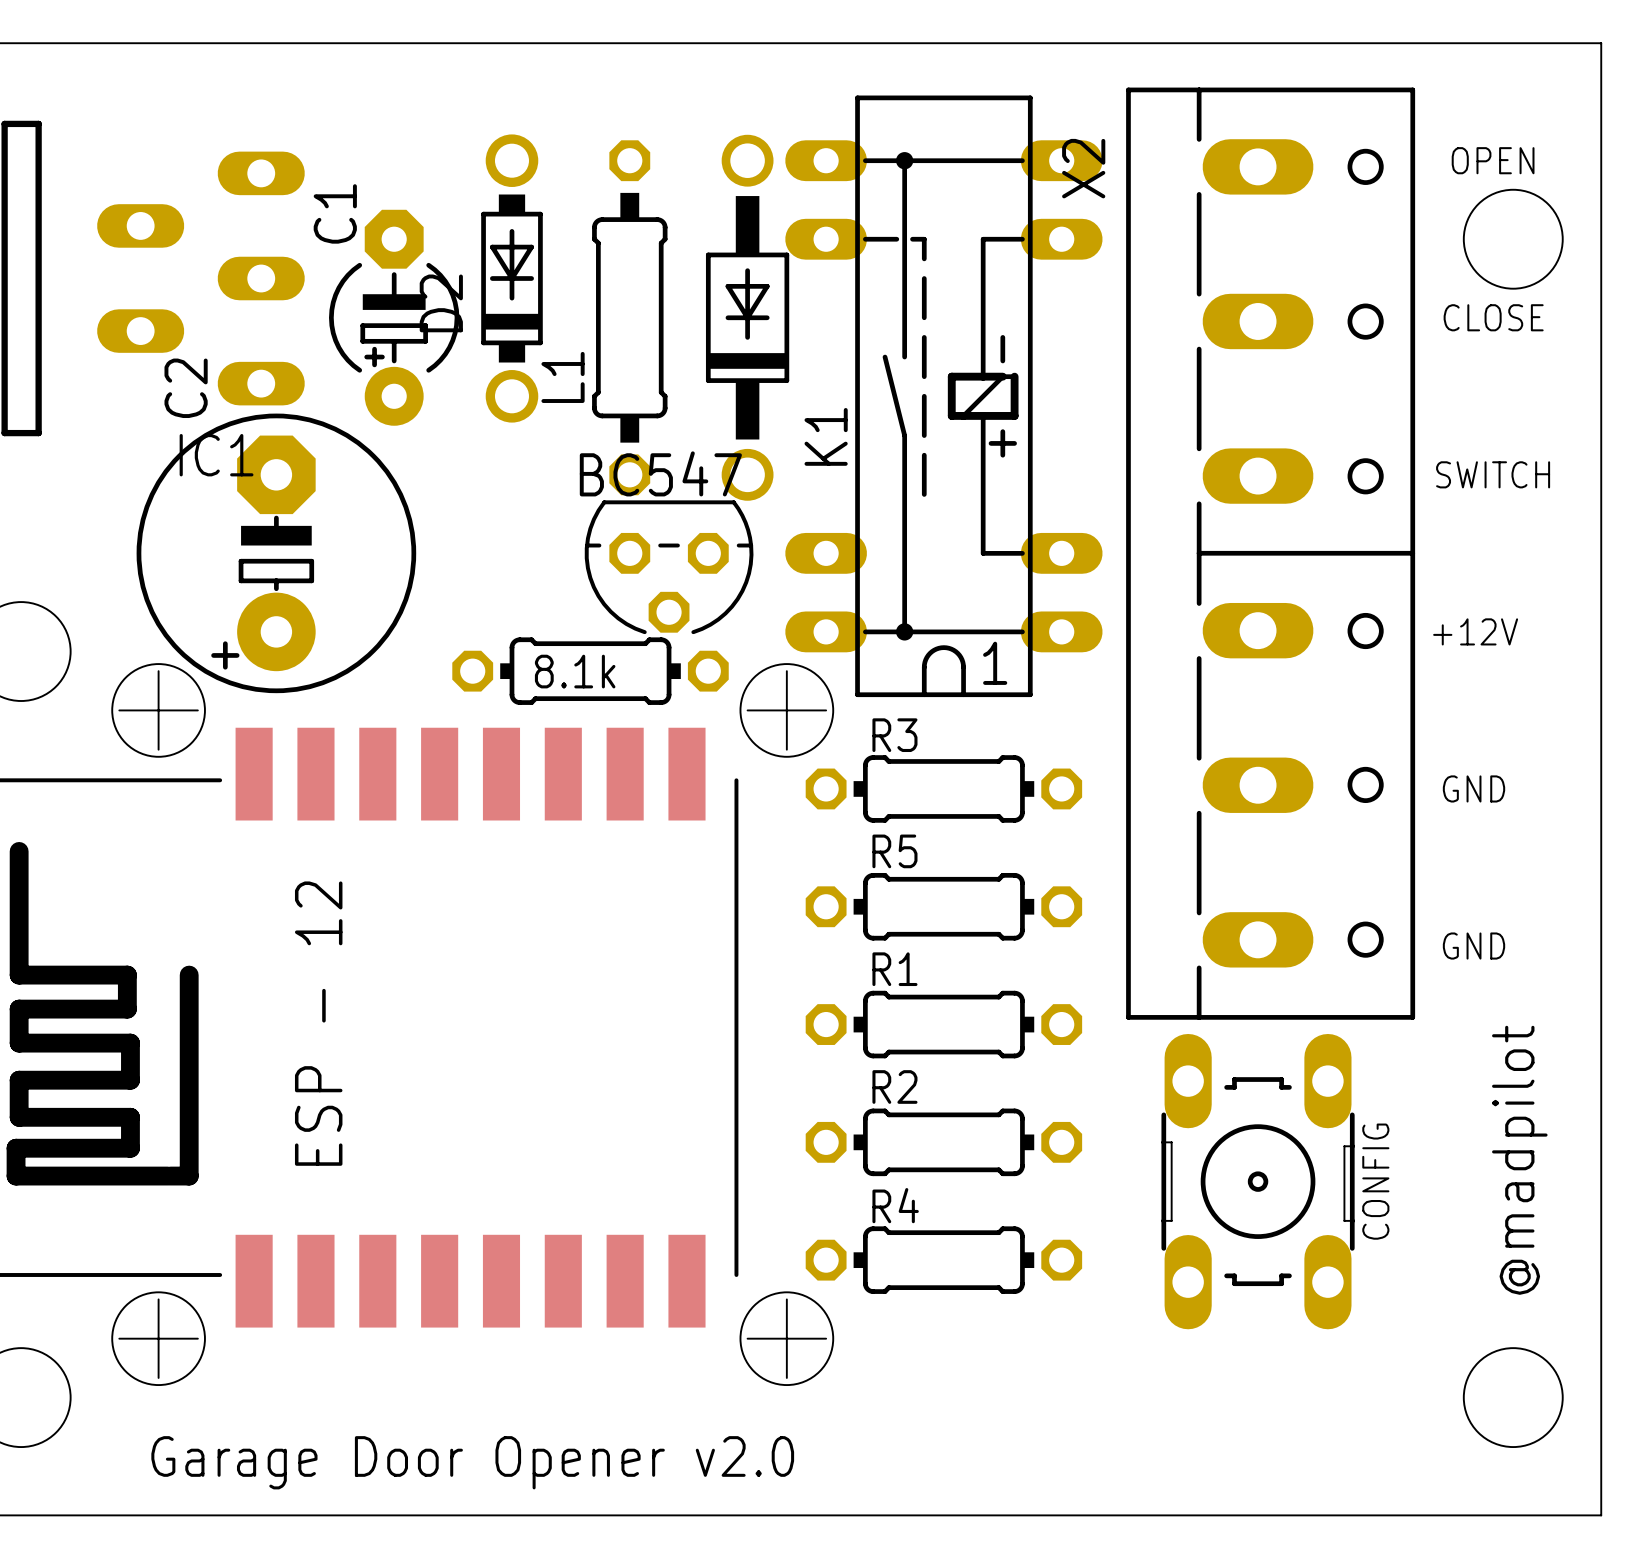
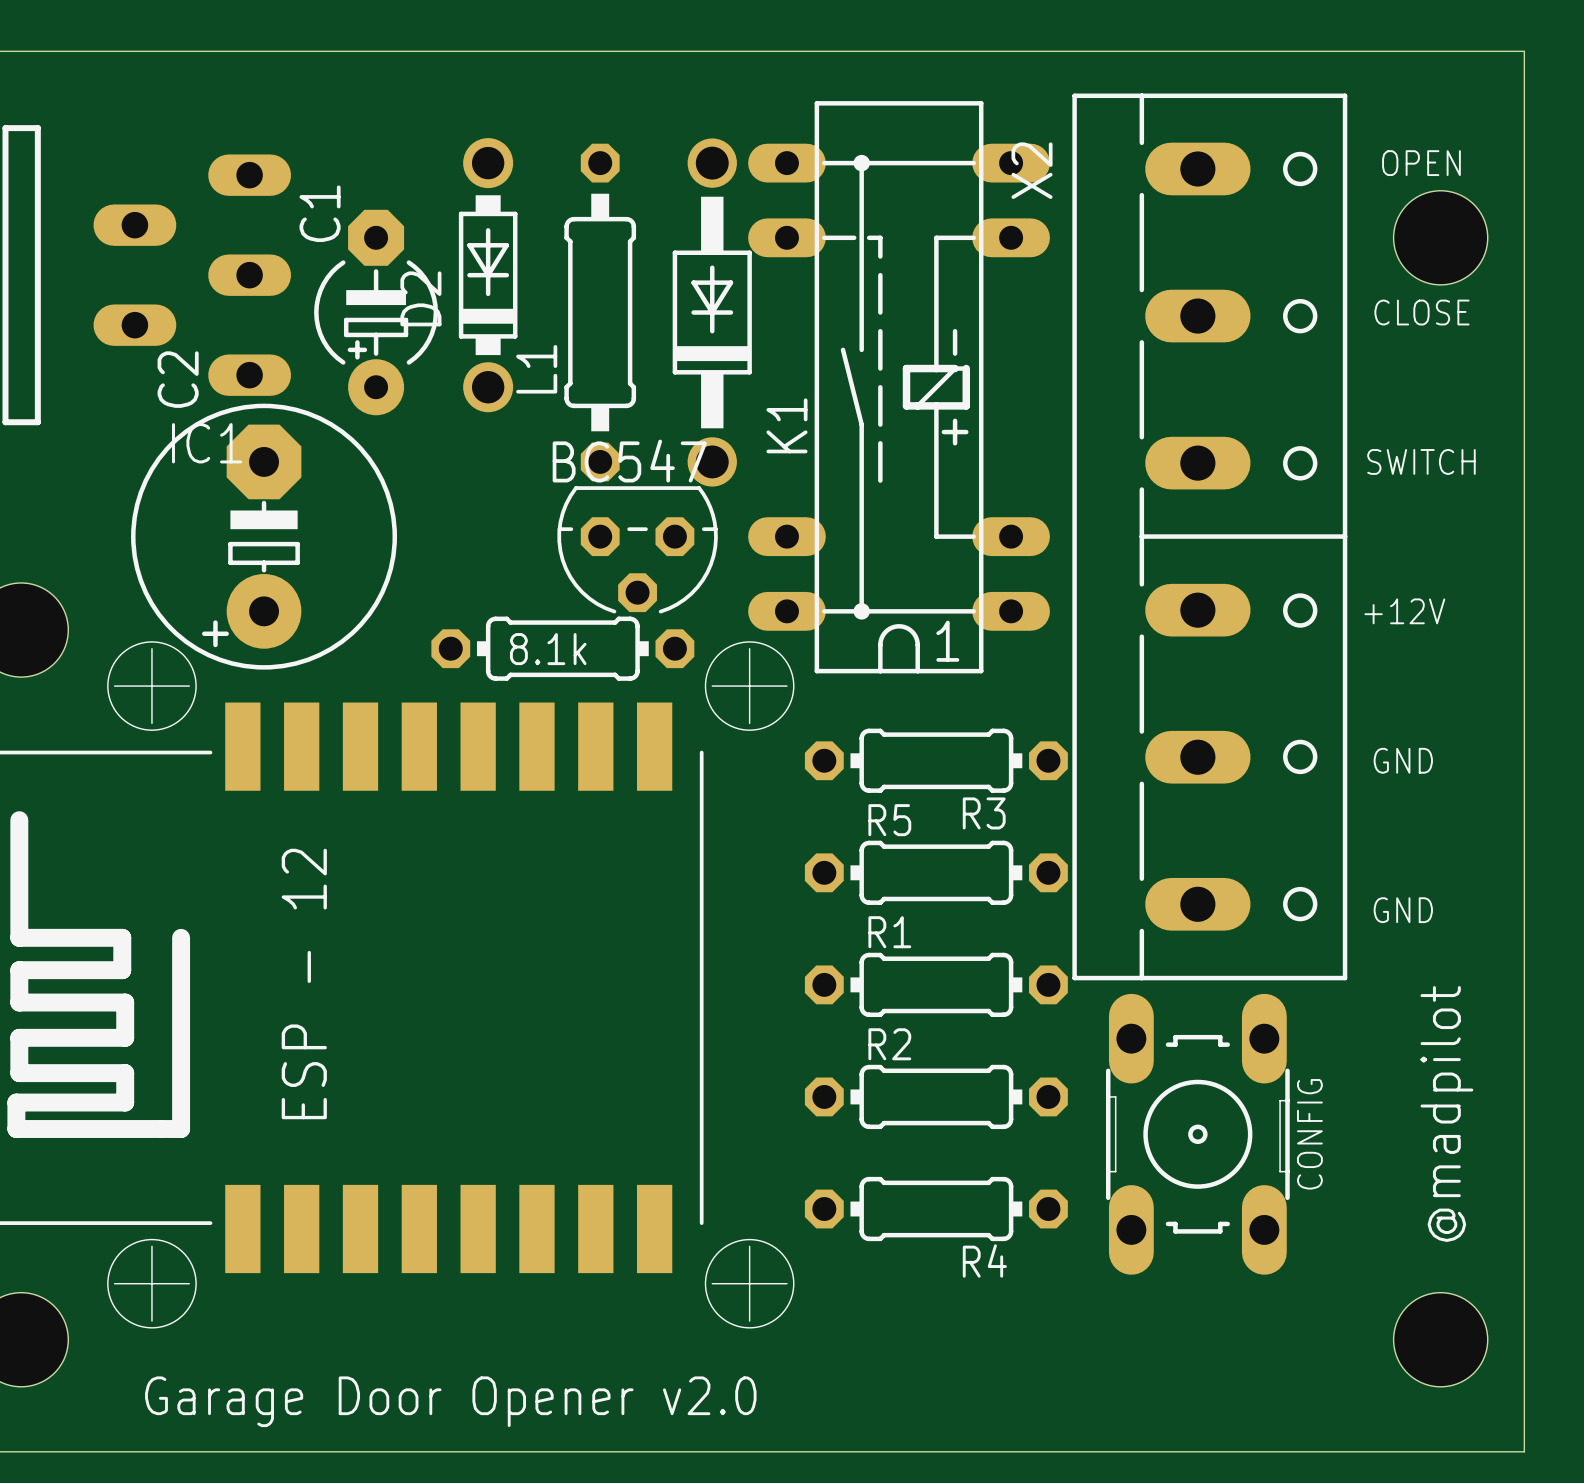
R3 name position: R3 (894, 735) -> R3 (984, 813)
R3 position: (943, 788) -> (936, 760)
R5 position: (943, 906) -> (936, 872)
R1 position: (943, 1024) -> (936, 984)
R2 position: (943, 1142) -> (936, 1096)
R4 name position: R4 (895, 1205) -> R4 (984, 1260)
R4 position: (943, 1260) -> (936, 1209)

